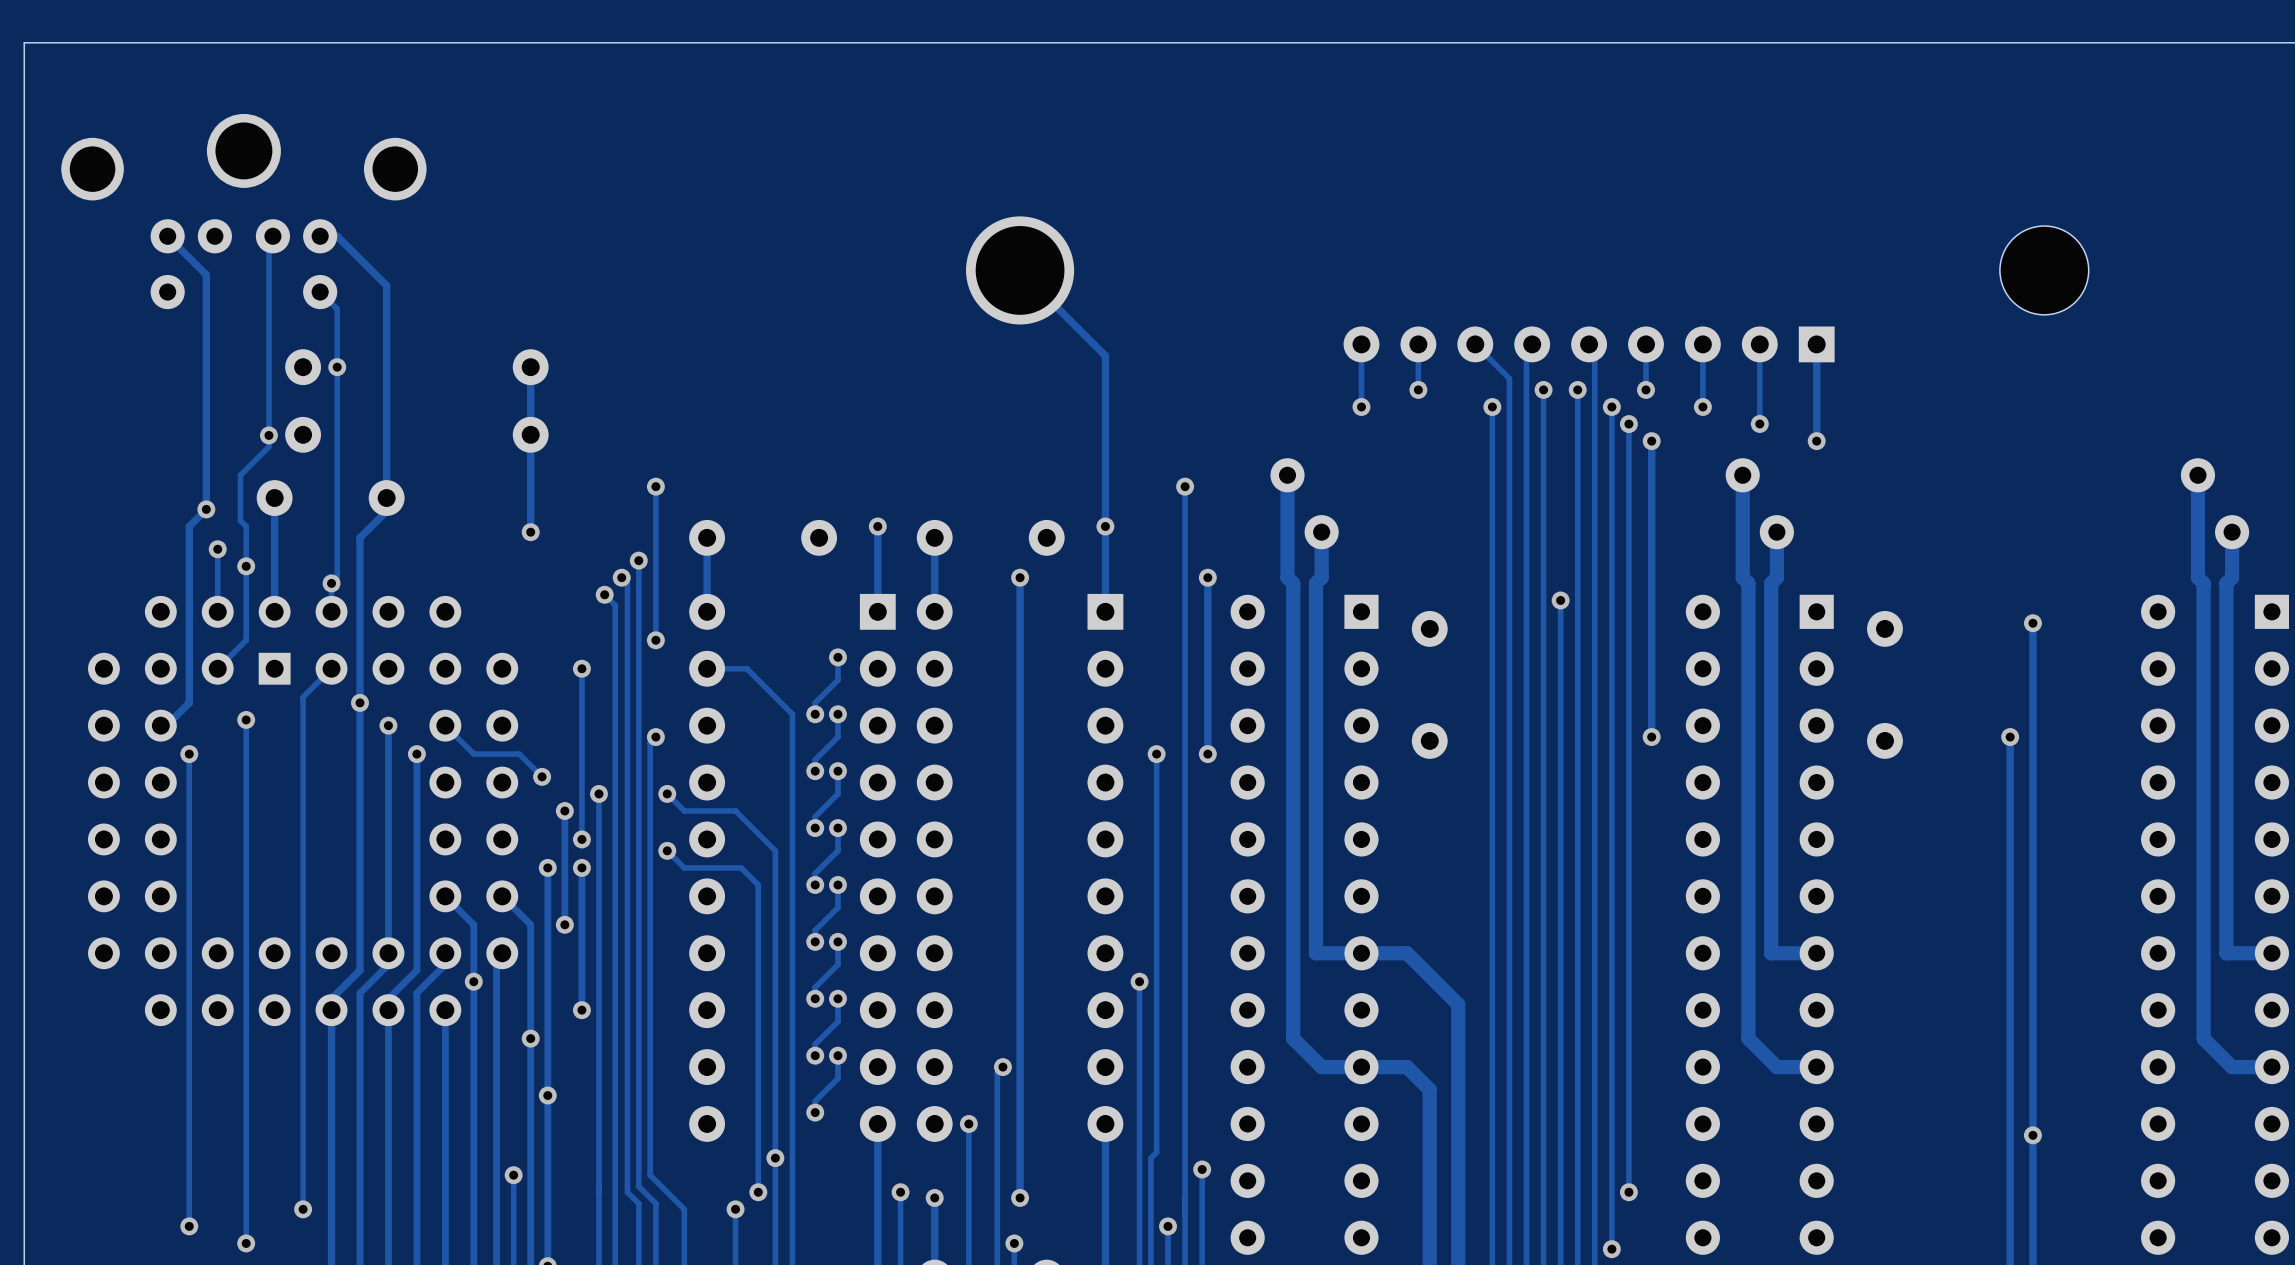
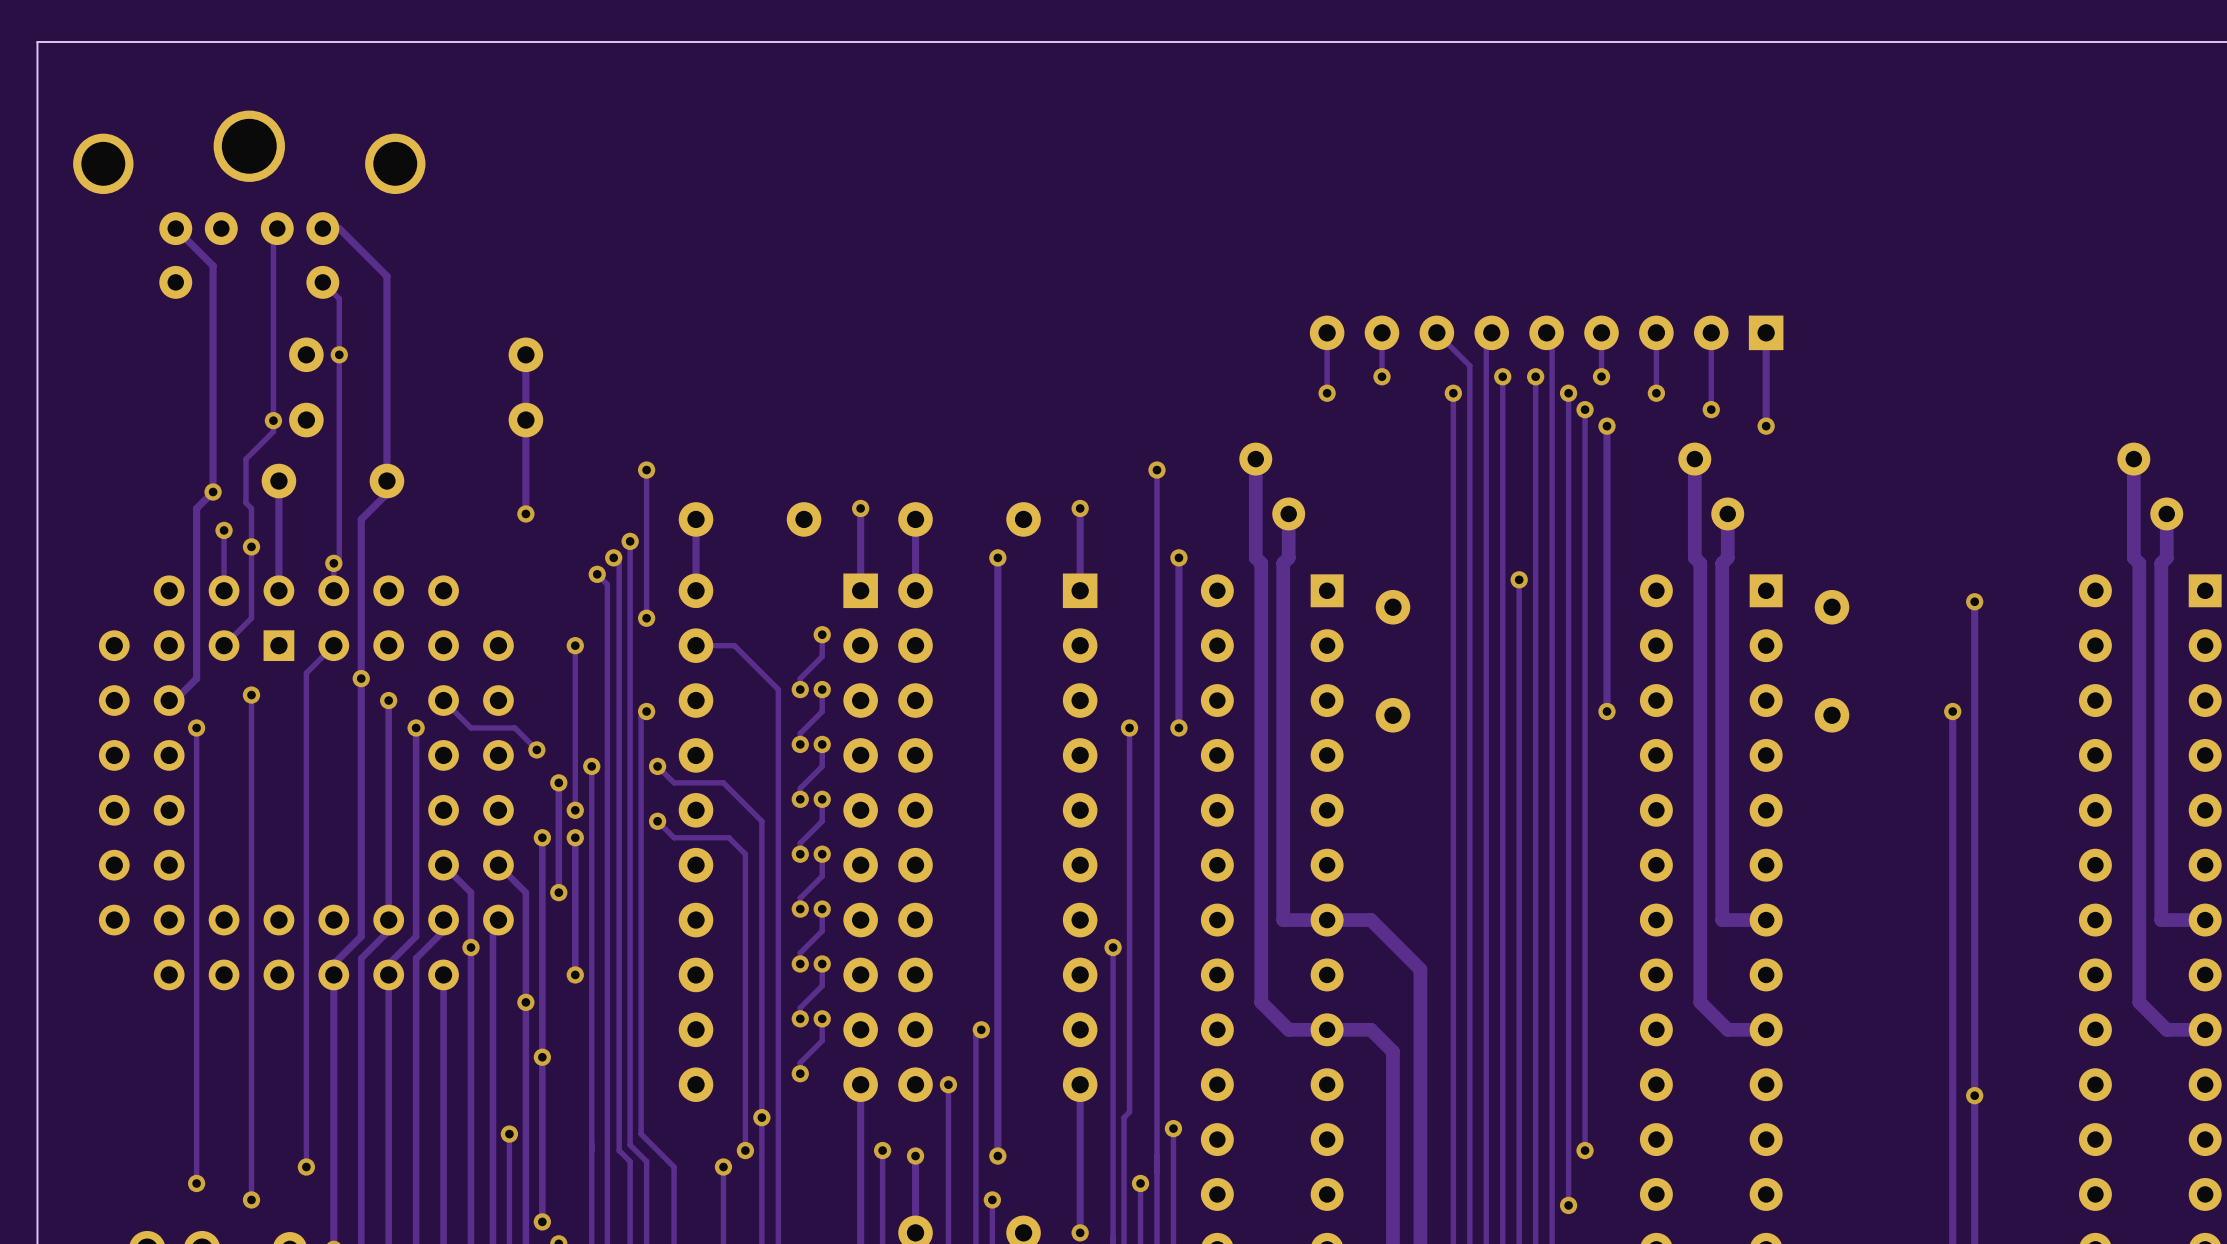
track: (1014, 264) (1105, 355) (1105, 526) -> none
part: (1020, 270) -> none
part: (2044, 270) -> none

